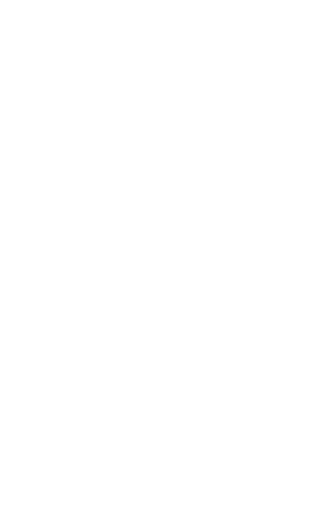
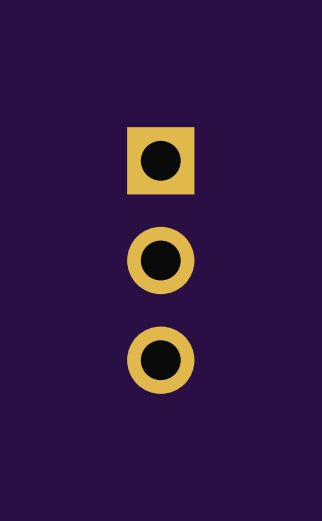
part: none -> (160, 260)

